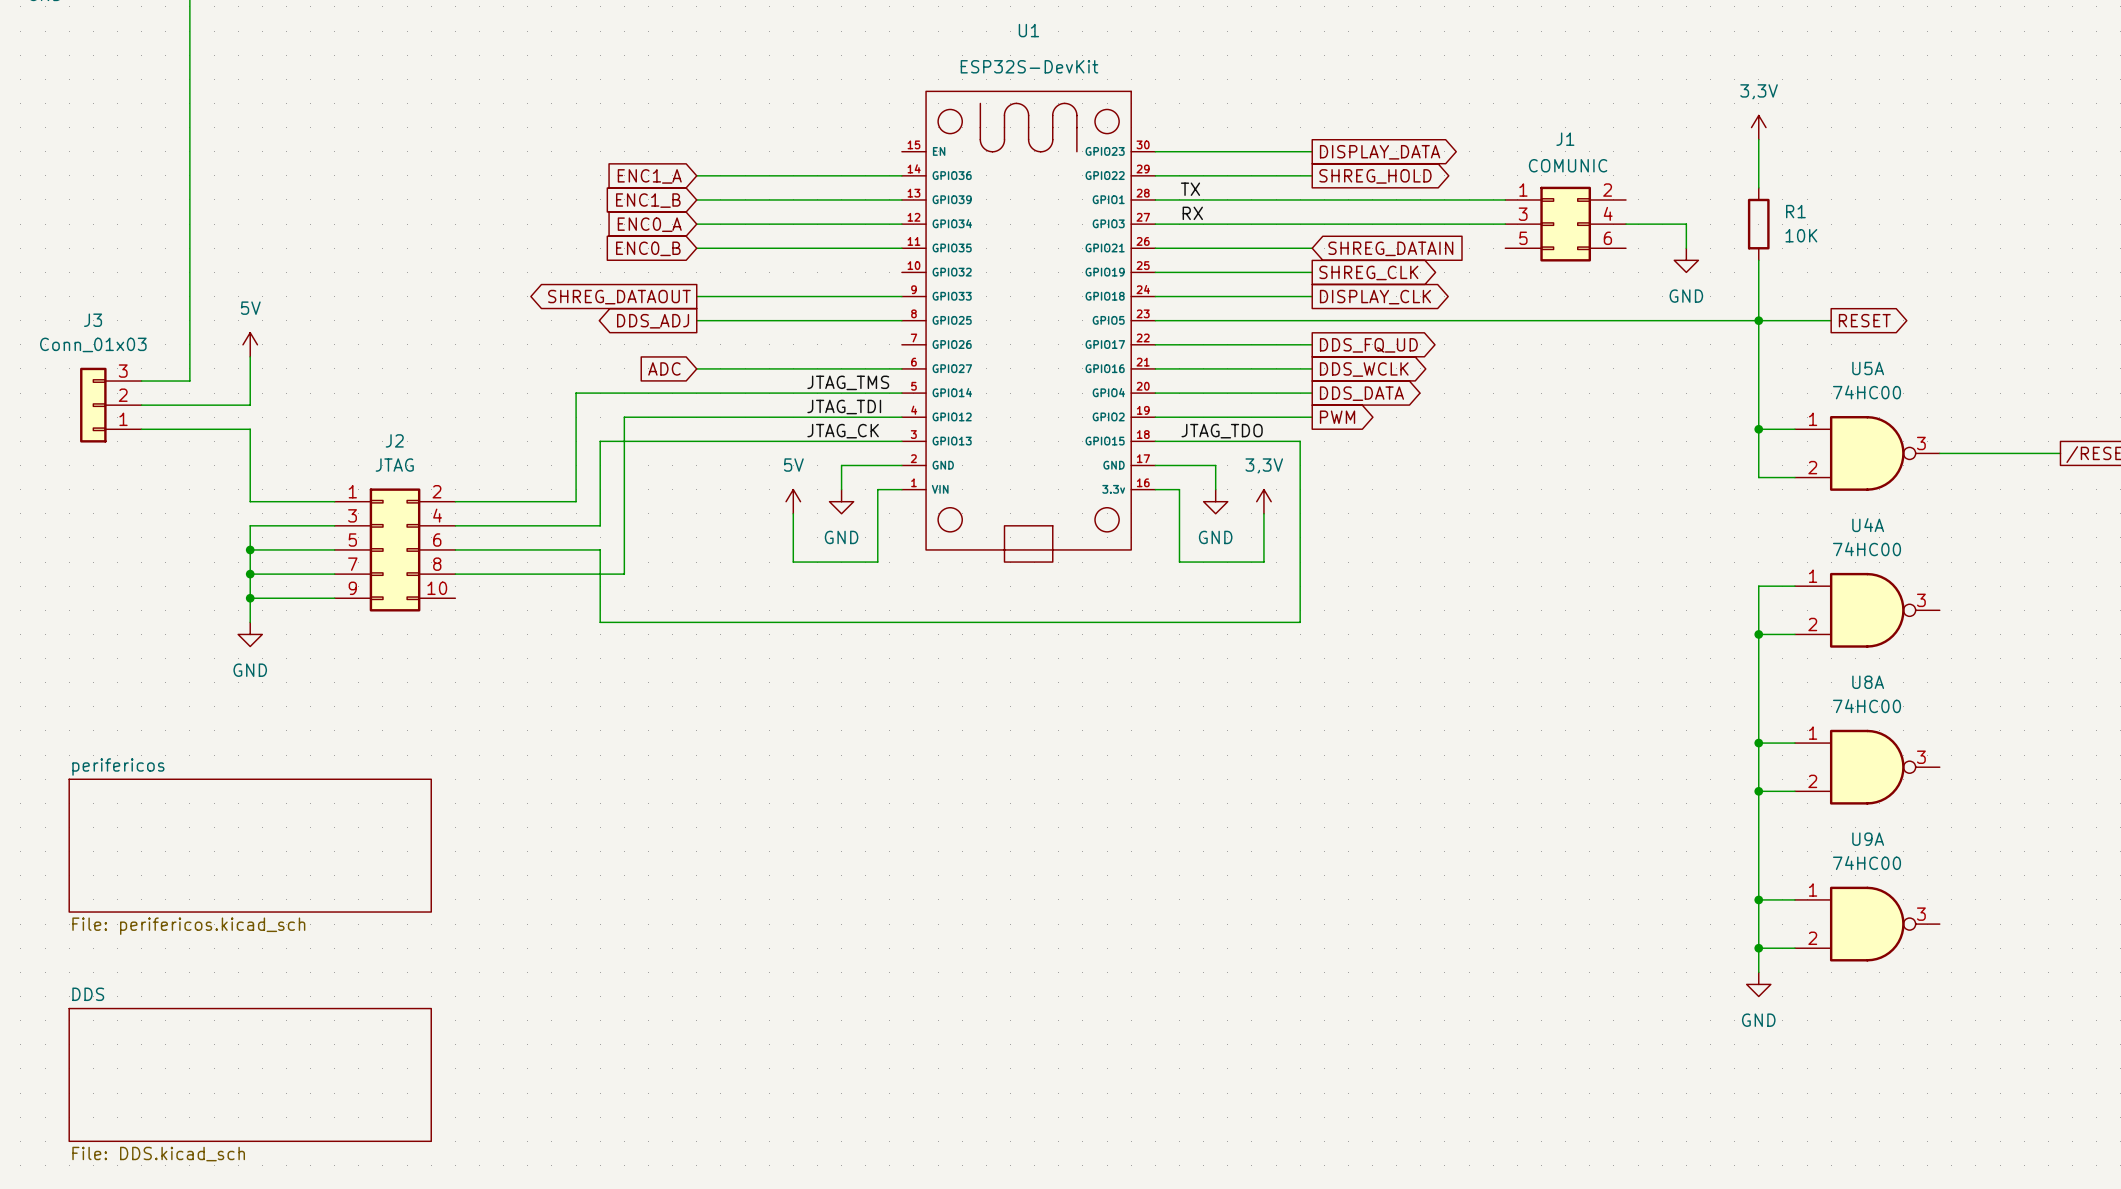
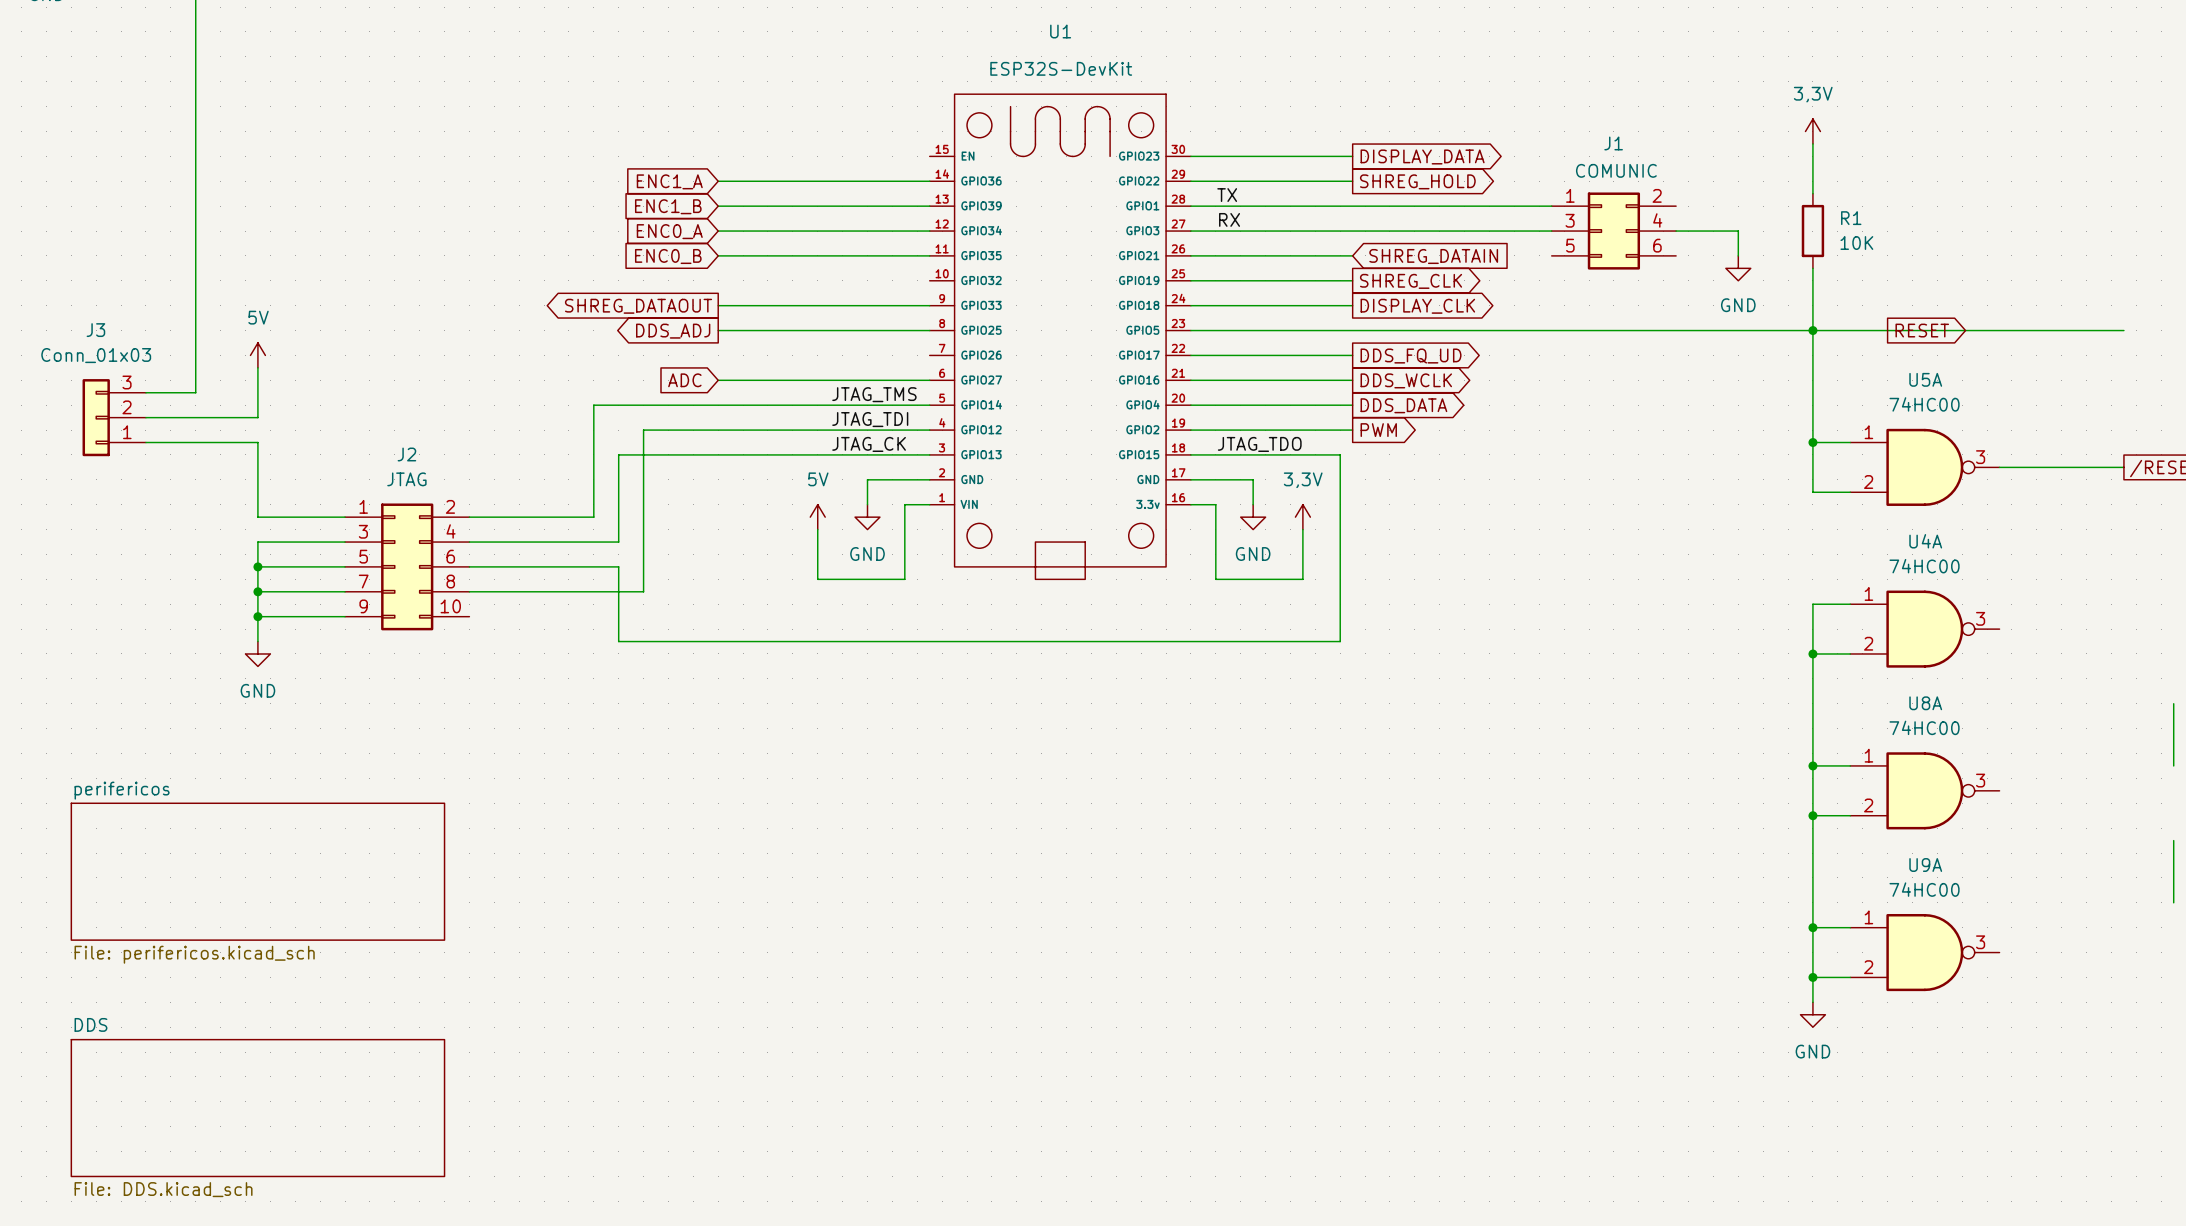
wire: none -> (1887, 330) (2123, 330)
wire: none -> (2173, 703) (2173, 765)
wire: none -> (2173, 840) (2173, 902)

